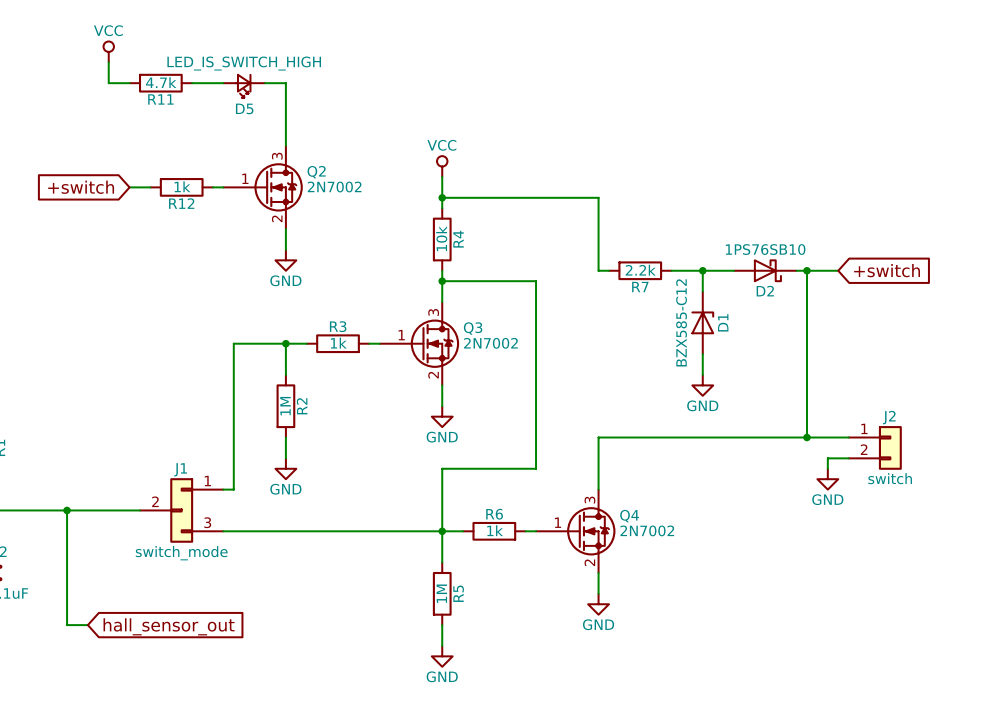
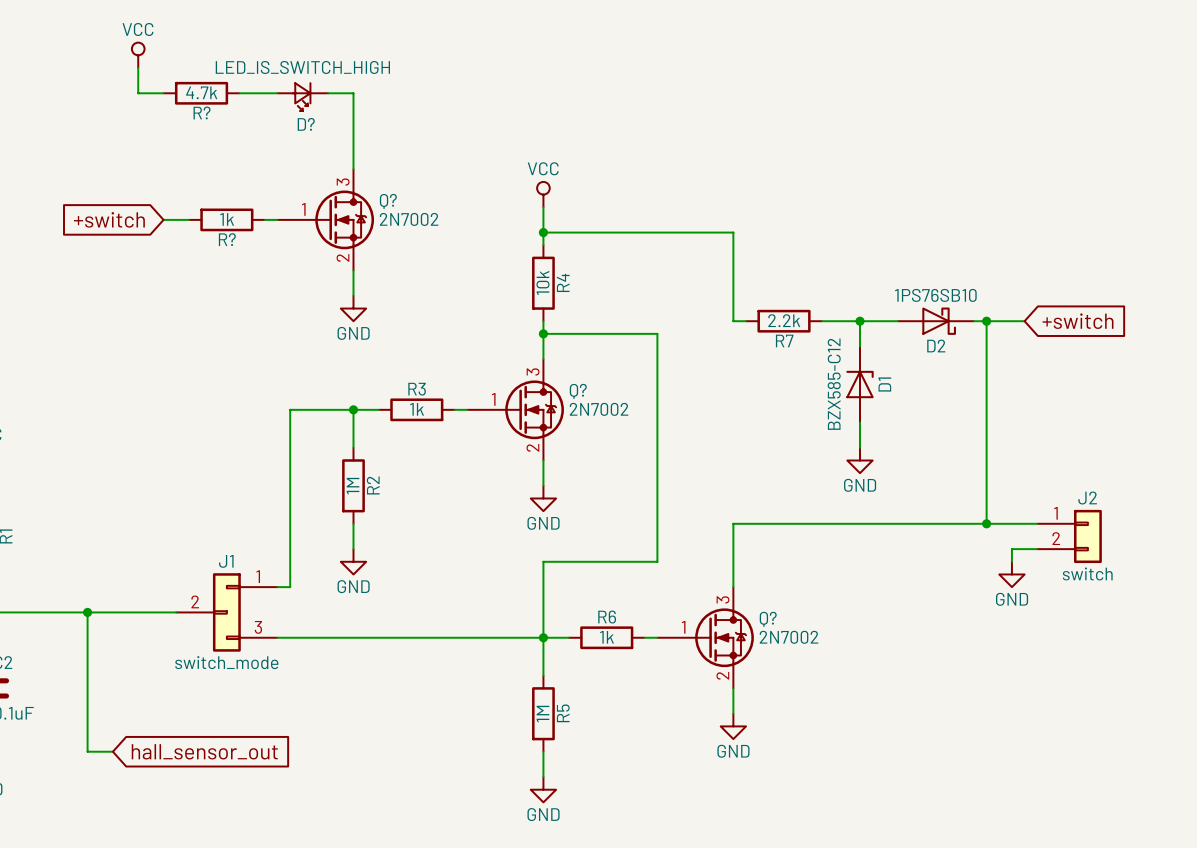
R11 name: R11 (160, 99) -> R? (202, 112)
D5 name: D5 (244, 108) -> D? (306, 124)
Q2 name: Q2 (316, 172) -> Q? (388, 201)
R12 name: R12 (181, 203) -> R? (227, 239)
Q3 name: Q3 (473, 328) -> Q? (578, 391)
Q4 name: Q4 (629, 516) -> Q? (768, 619)

